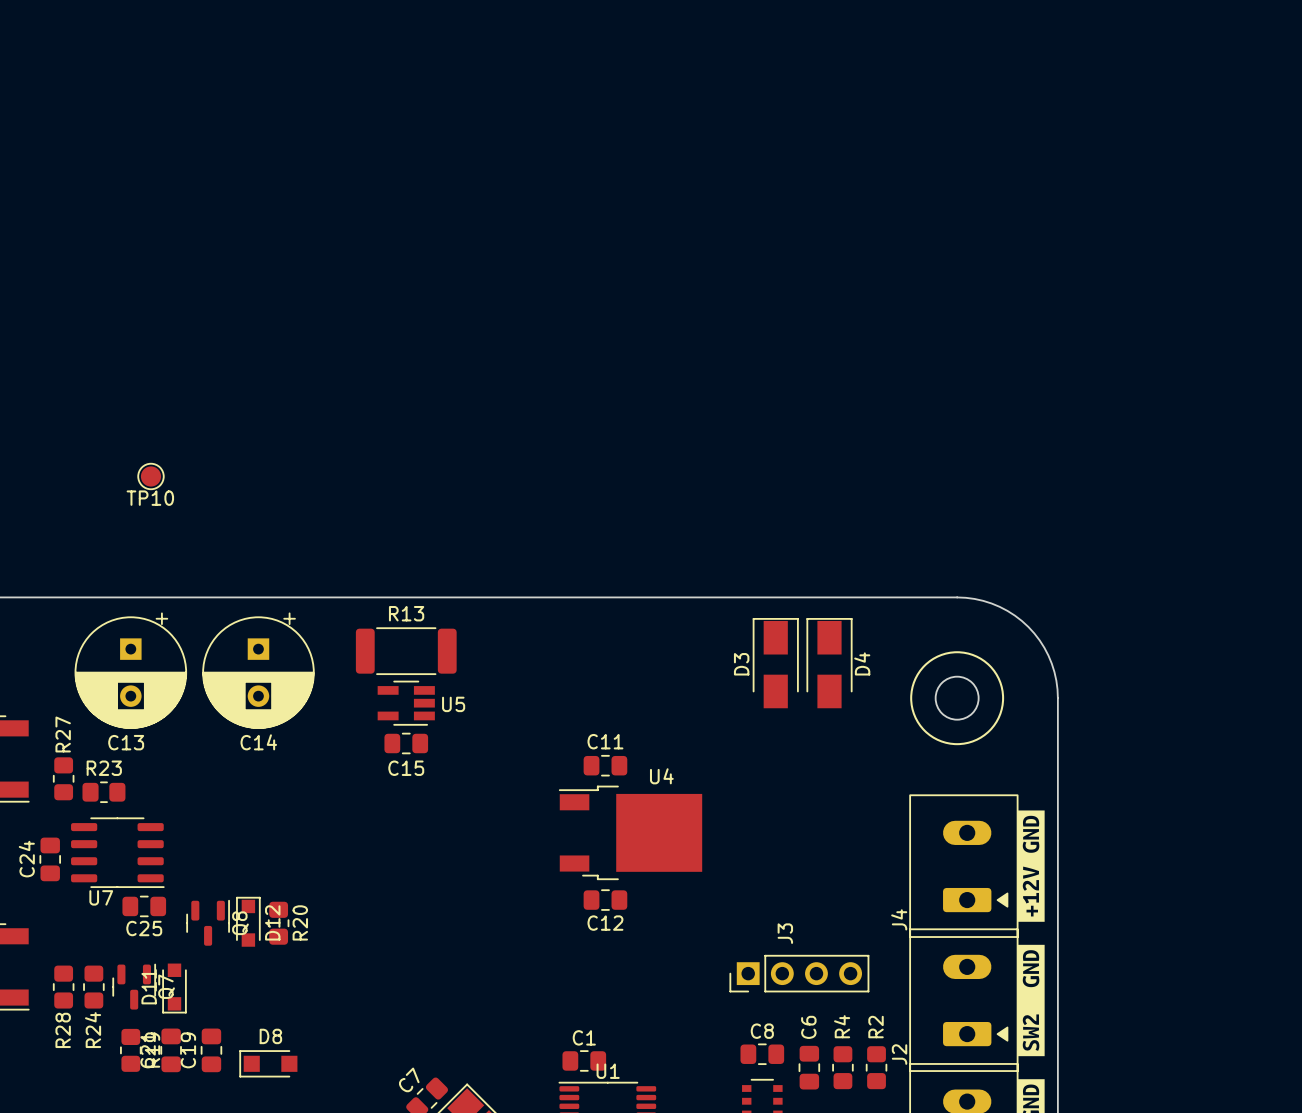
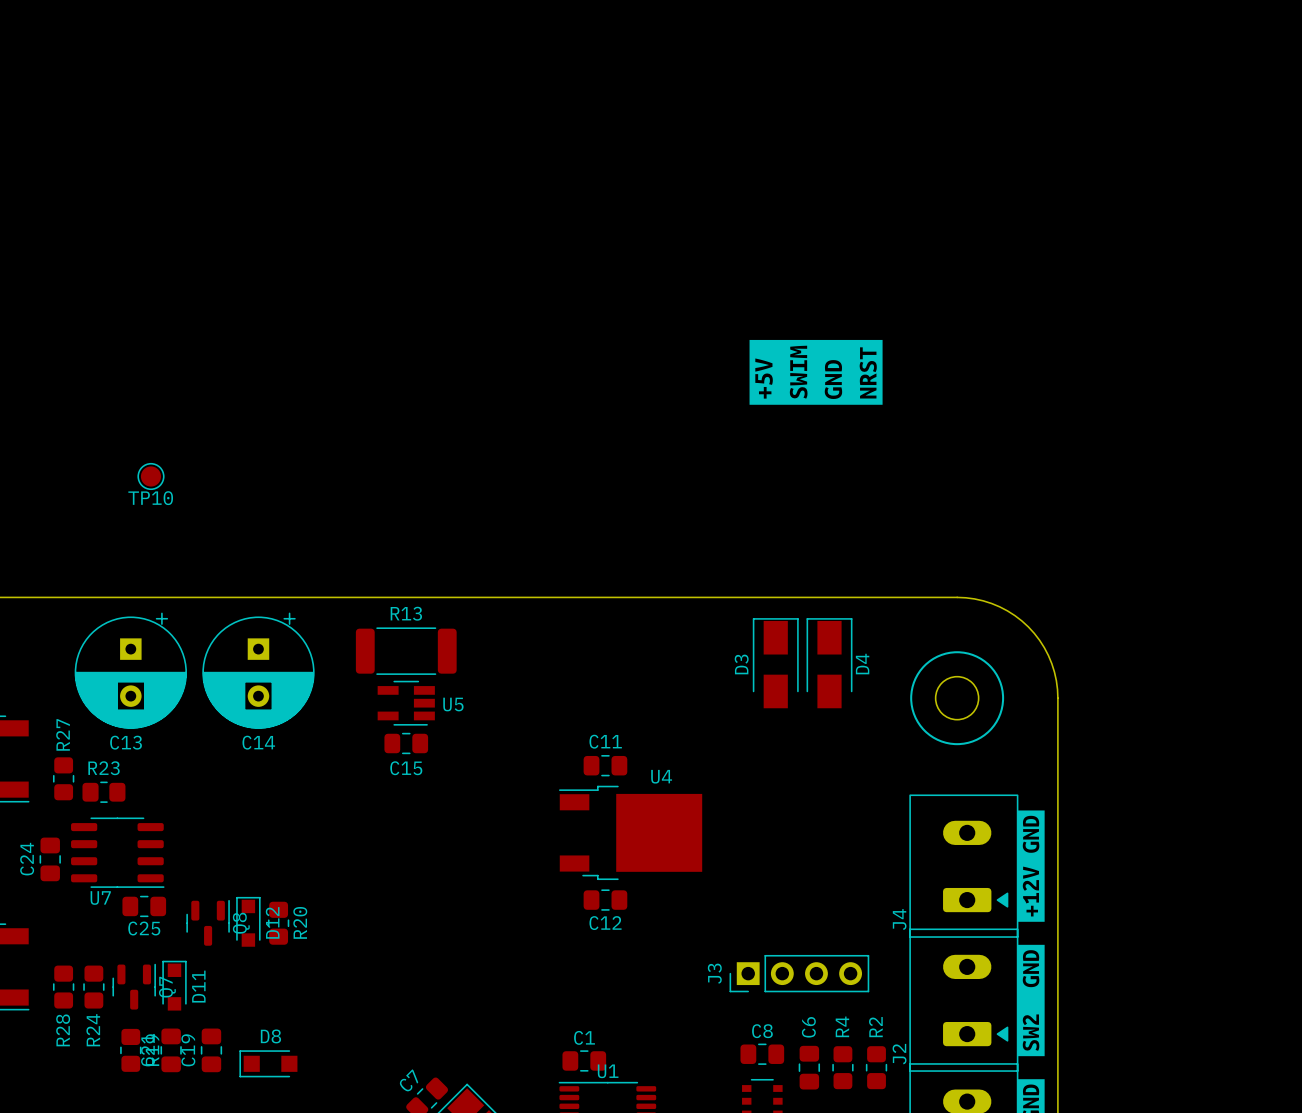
drawing: none -> [749, 339, 883, 405]
J3 name position: J3 (785, 933) -> J3 (714, 973)
D11 rotation: 0° (174, 988) -> 180° (174, 985)

